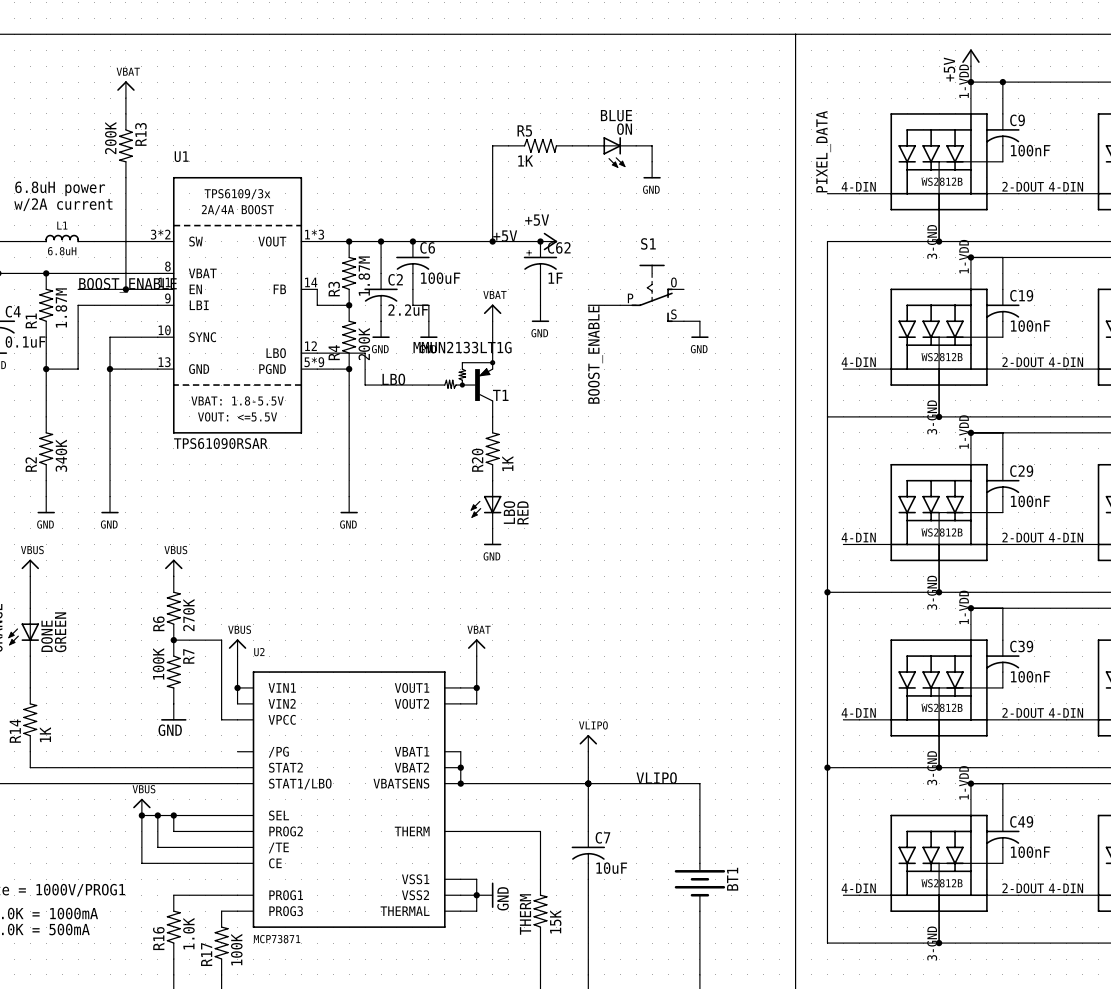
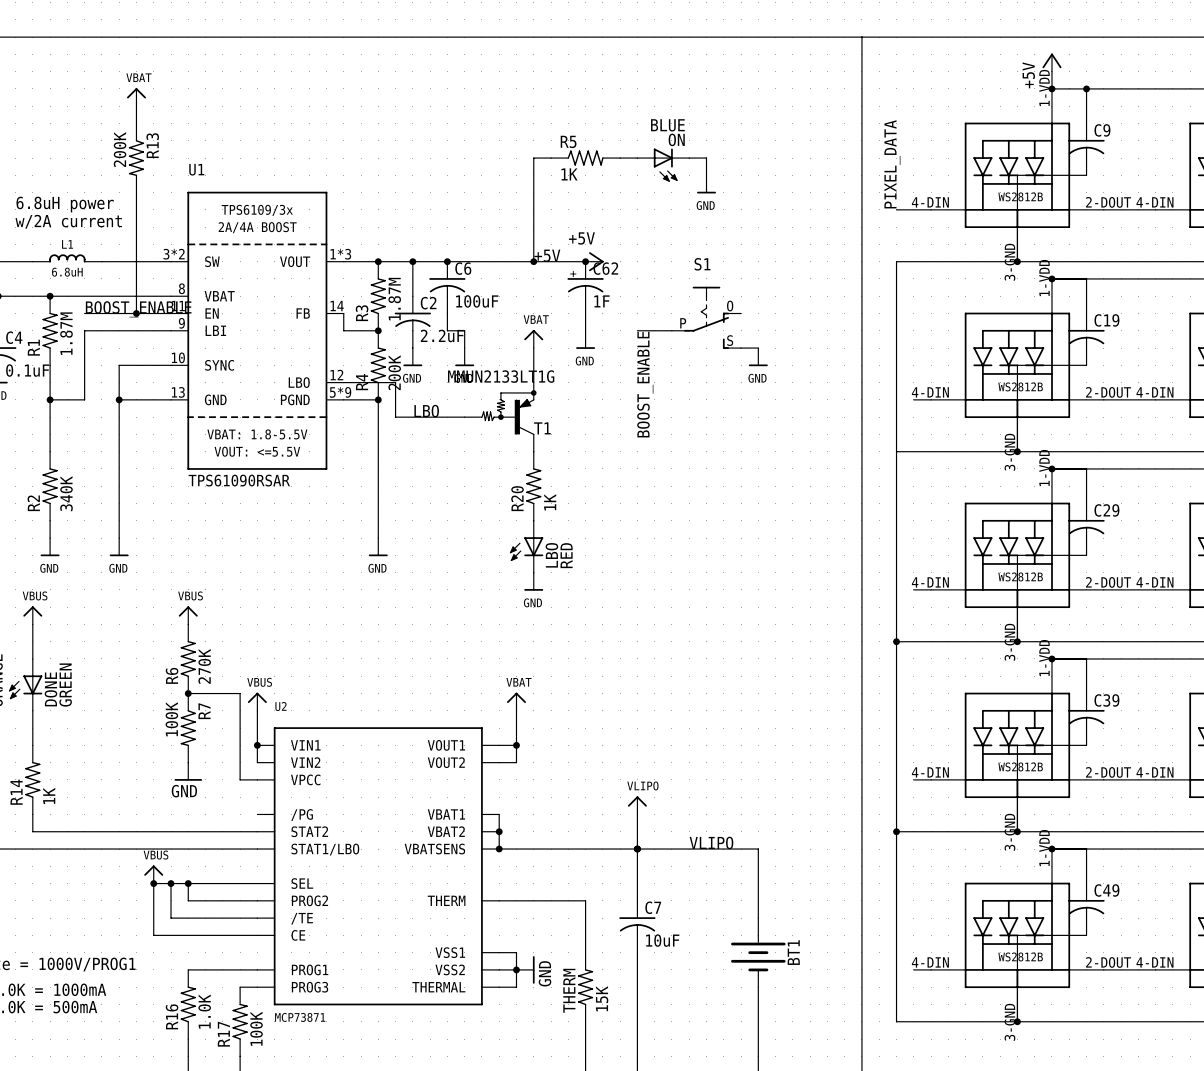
C9 value: 100nF (1030, 150) -> none
C19 value: 100nF (1030, 326) -> none
C29 value: 100nF (1030, 501) -> none
C39 value: 100nF (1030, 676) -> none
C49 value: 100nF (1030, 852) -> none

